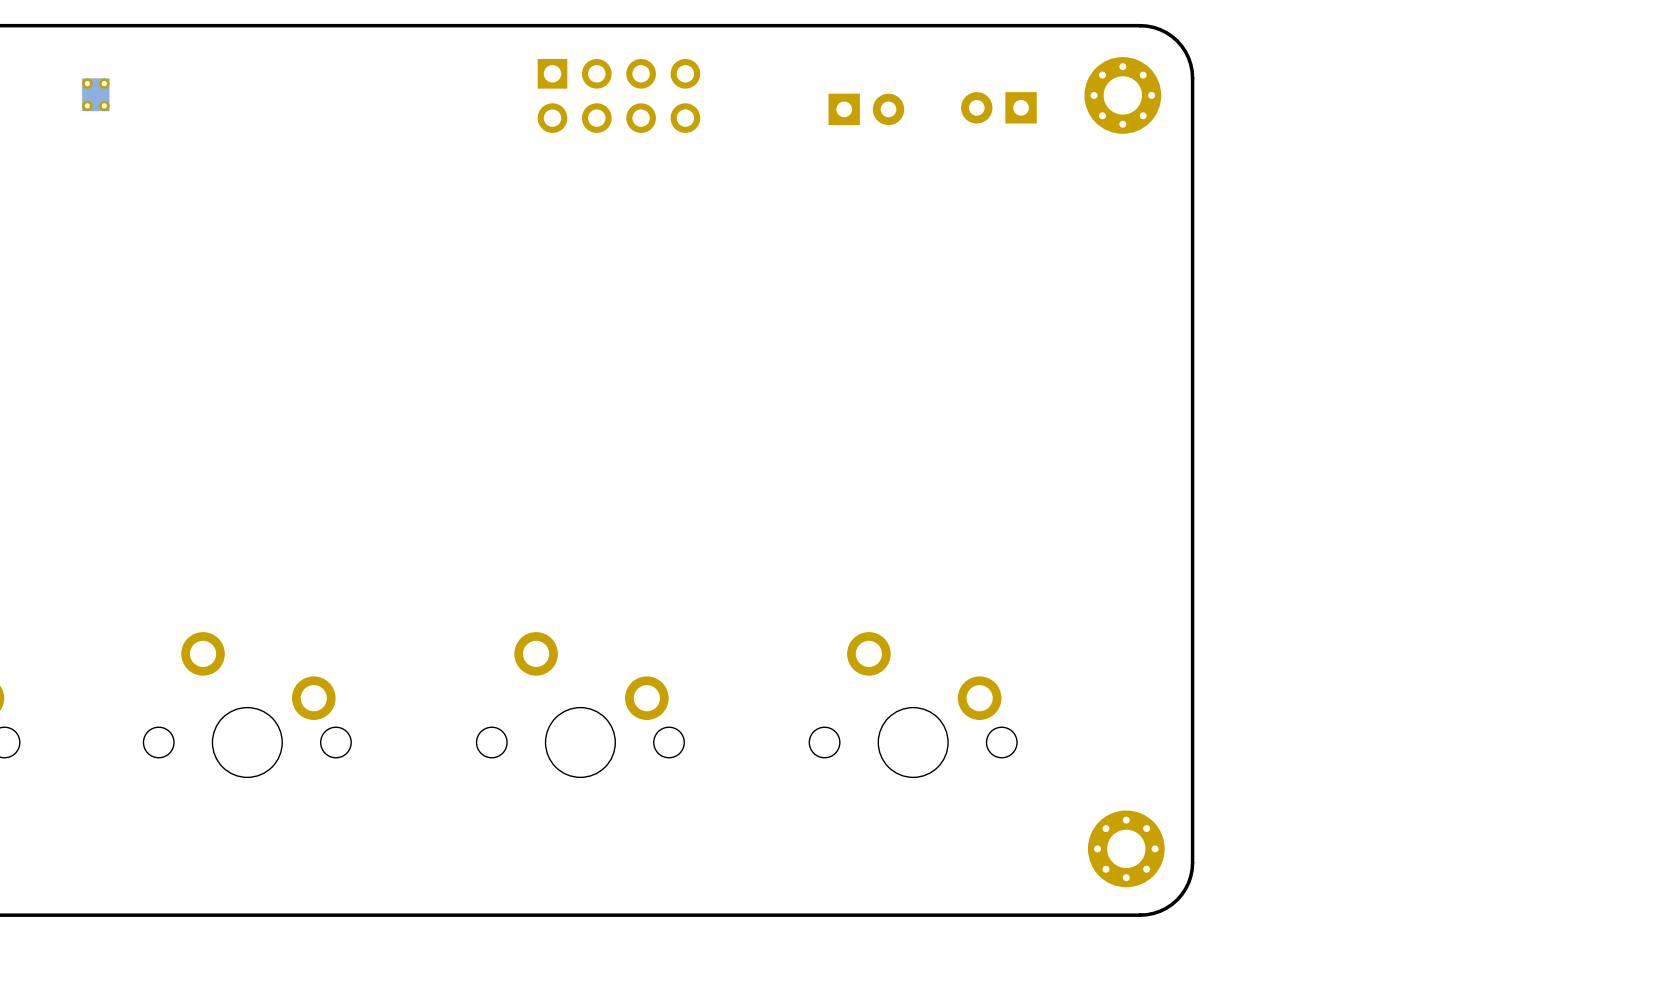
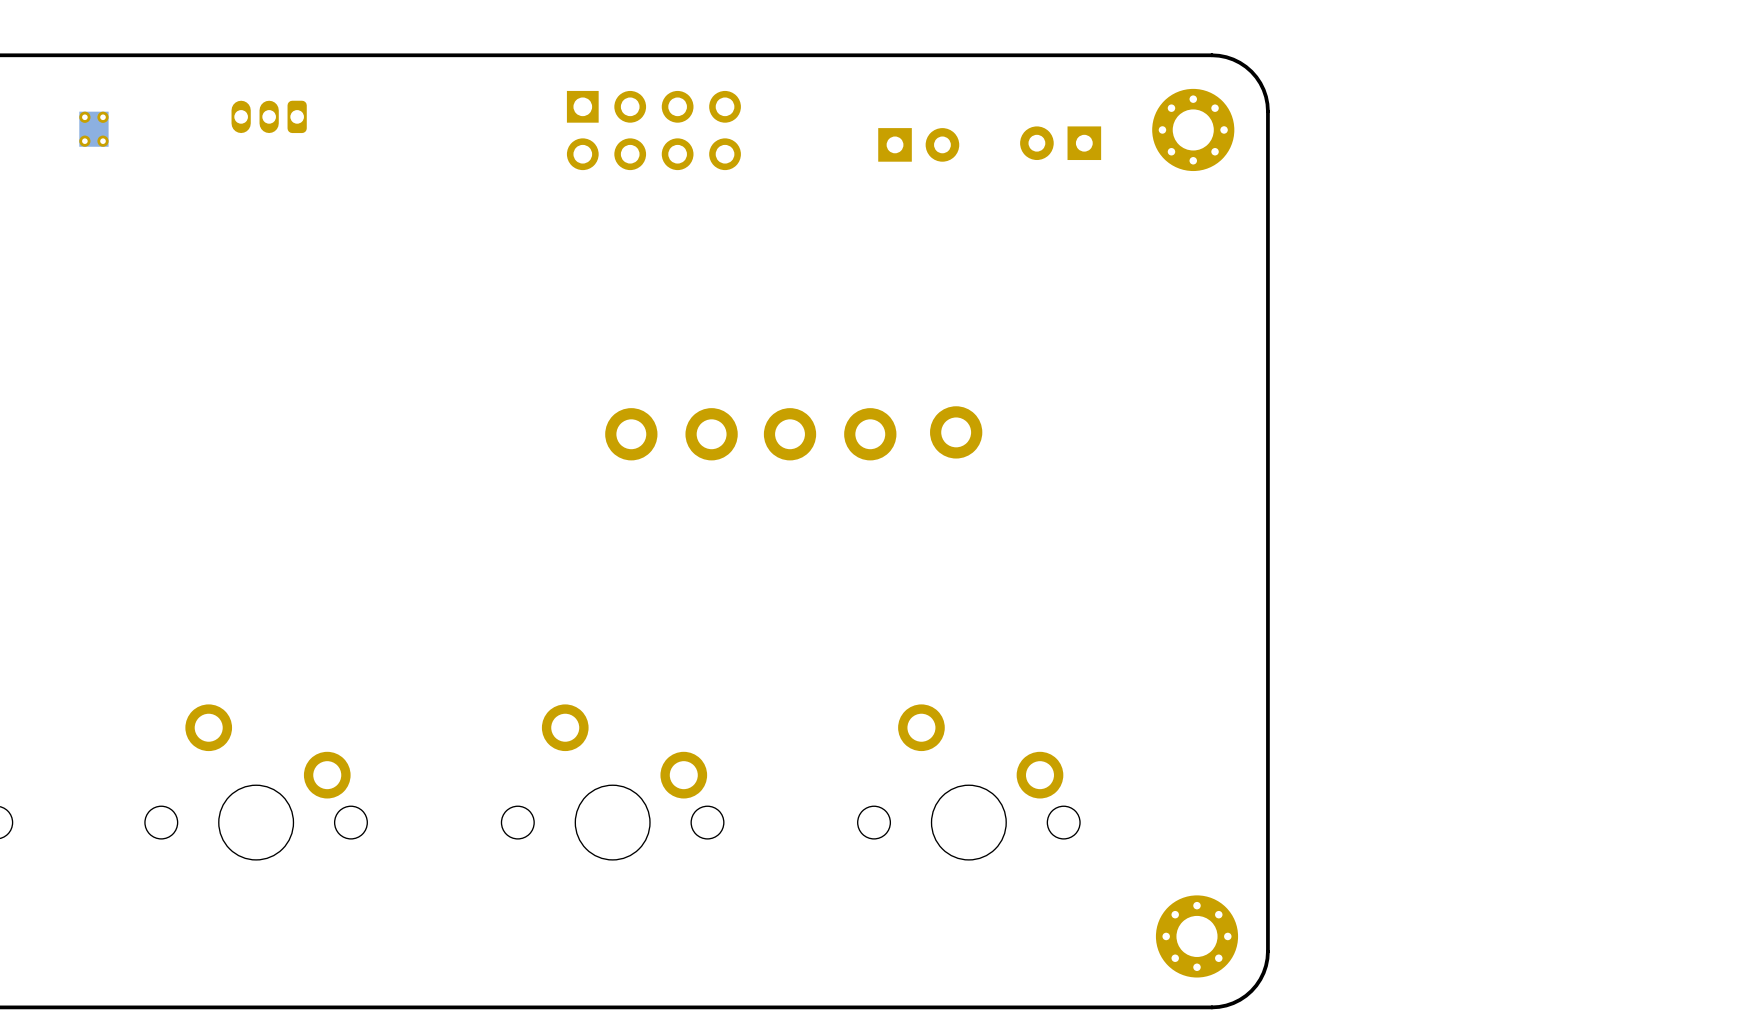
part: none -> (269, 116)
part: none -> (956, 432)
part: none -> (631, 434)
part: none -> (711, 434)
part: none -> (790, 434)
part: none -> (870, 434)

